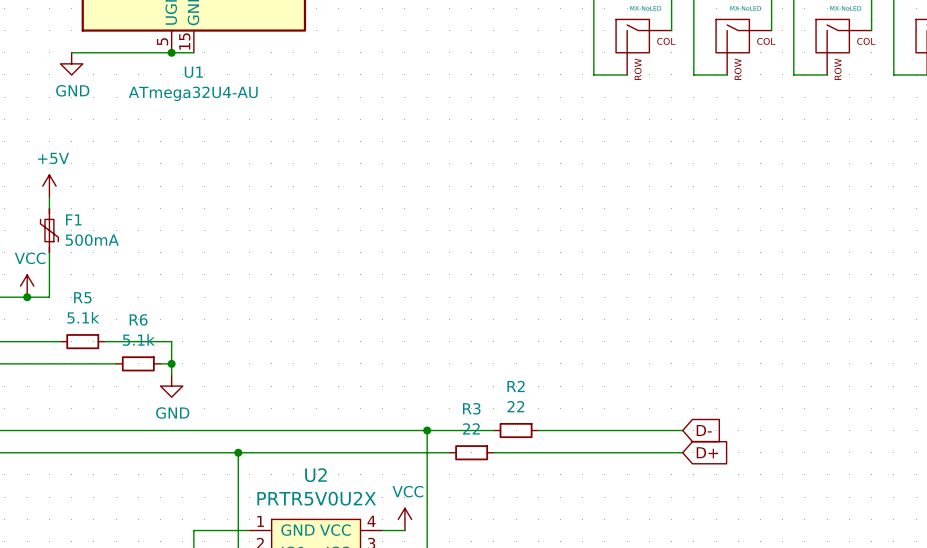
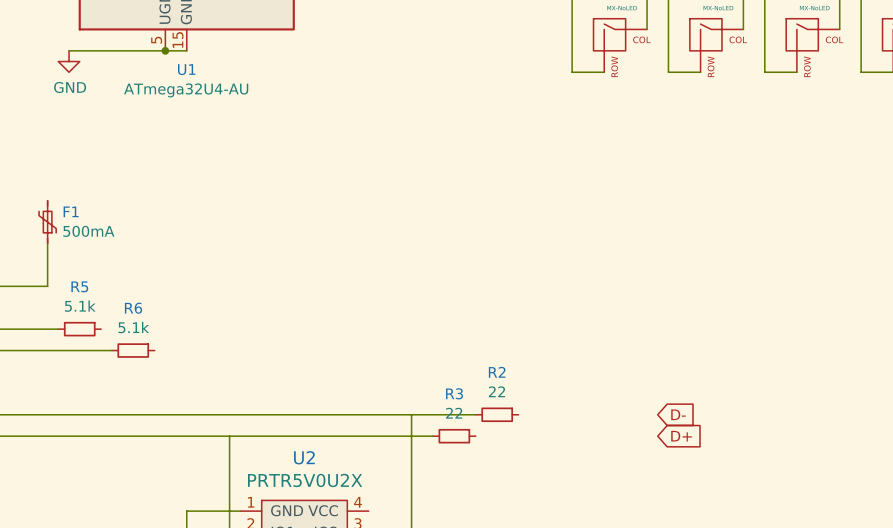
power symbol: +5V (49, 186) -> none
wire: (49, 197) (49, 208) -> none
power symbol: VCC (27, 286) -> none
junction: (27, 297) -> none
wire: (104, 341) (171, 341) (171, 374) -> none
wire: (160, 363) (171, 363) -> none
junction: (171, 363) -> none
power symbol: GND (171, 386) -> none
junction: (427, 430) -> none
wire: (538, 430) (682, 430) -> none
junction: (238, 452) -> none
wire: (493, 452) (682, 452) -> none
power symbol: VCC (404, 519) -> none
wire: (382, 530) (404, 530) -> none

